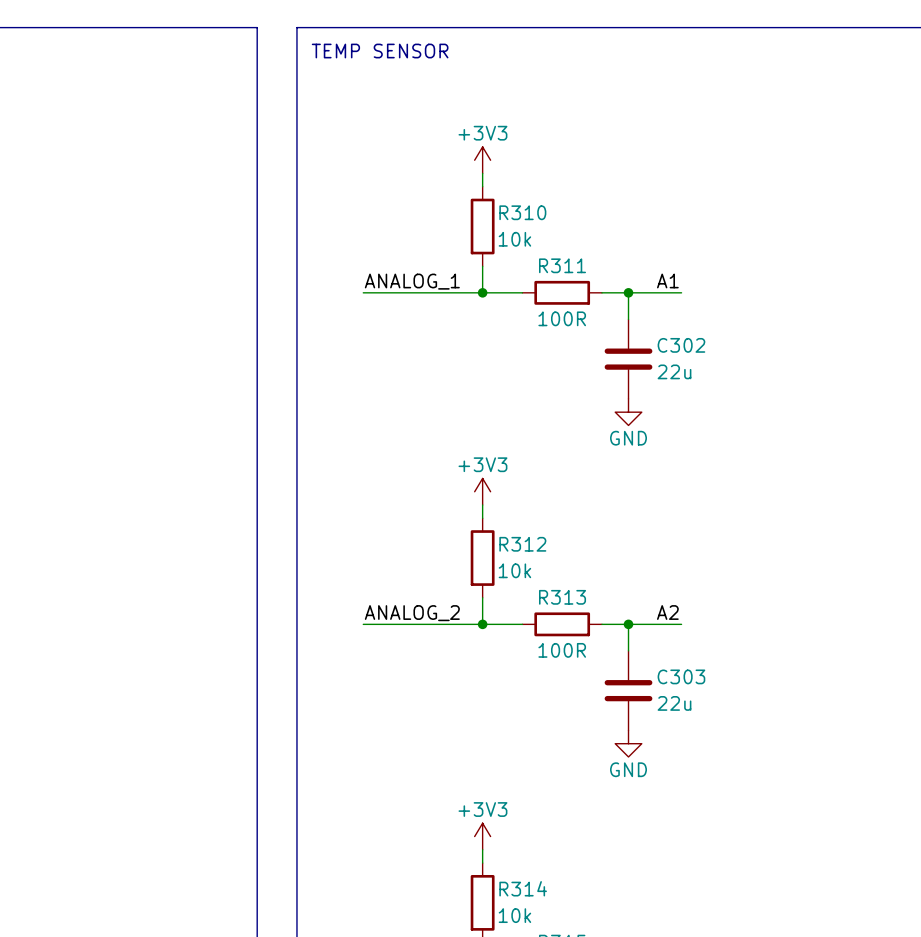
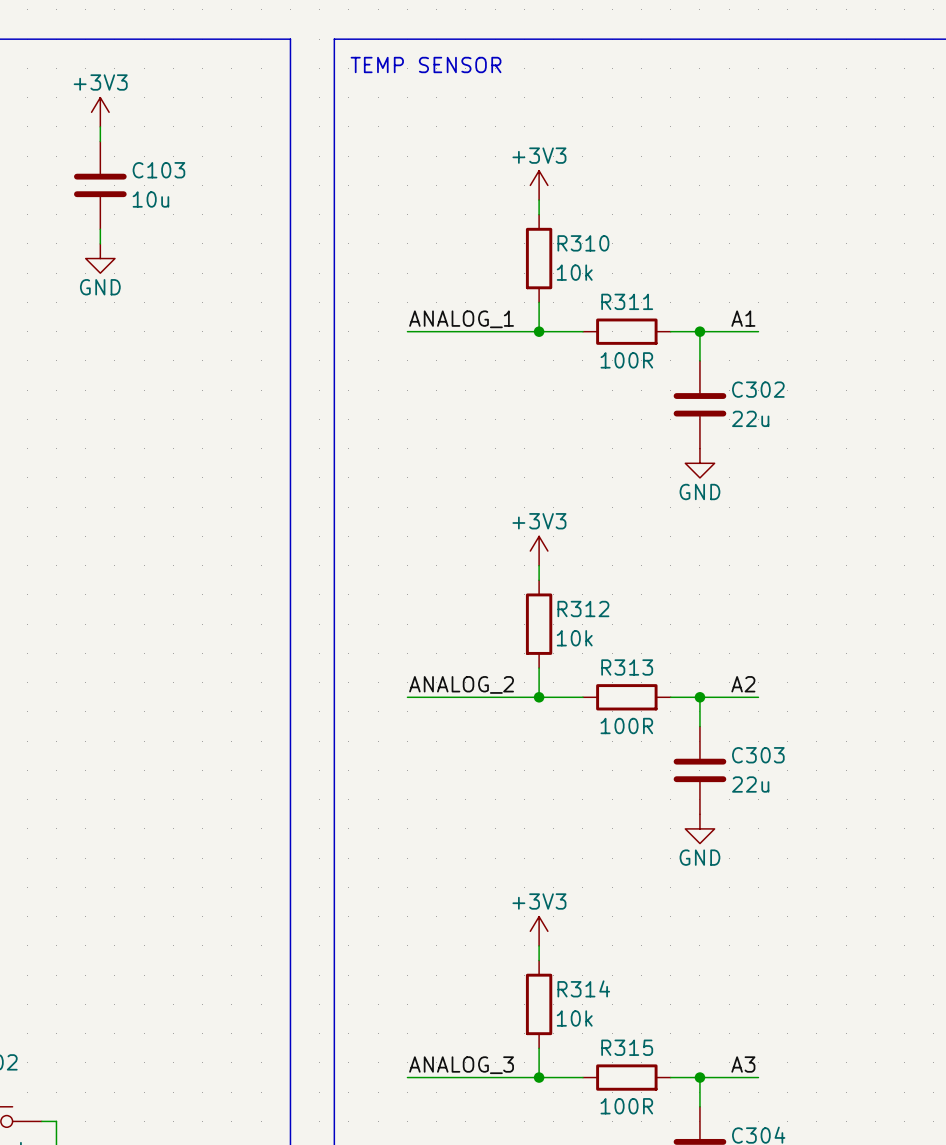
power symbol: none -> +3V3 (100, 112)
wire: none -> (100, 126) (100, 141)
C103: none -> 10u (100, 185)
wire: none -> (100, 229) (100, 243)
power symbol: none -> GND (100, 258)

